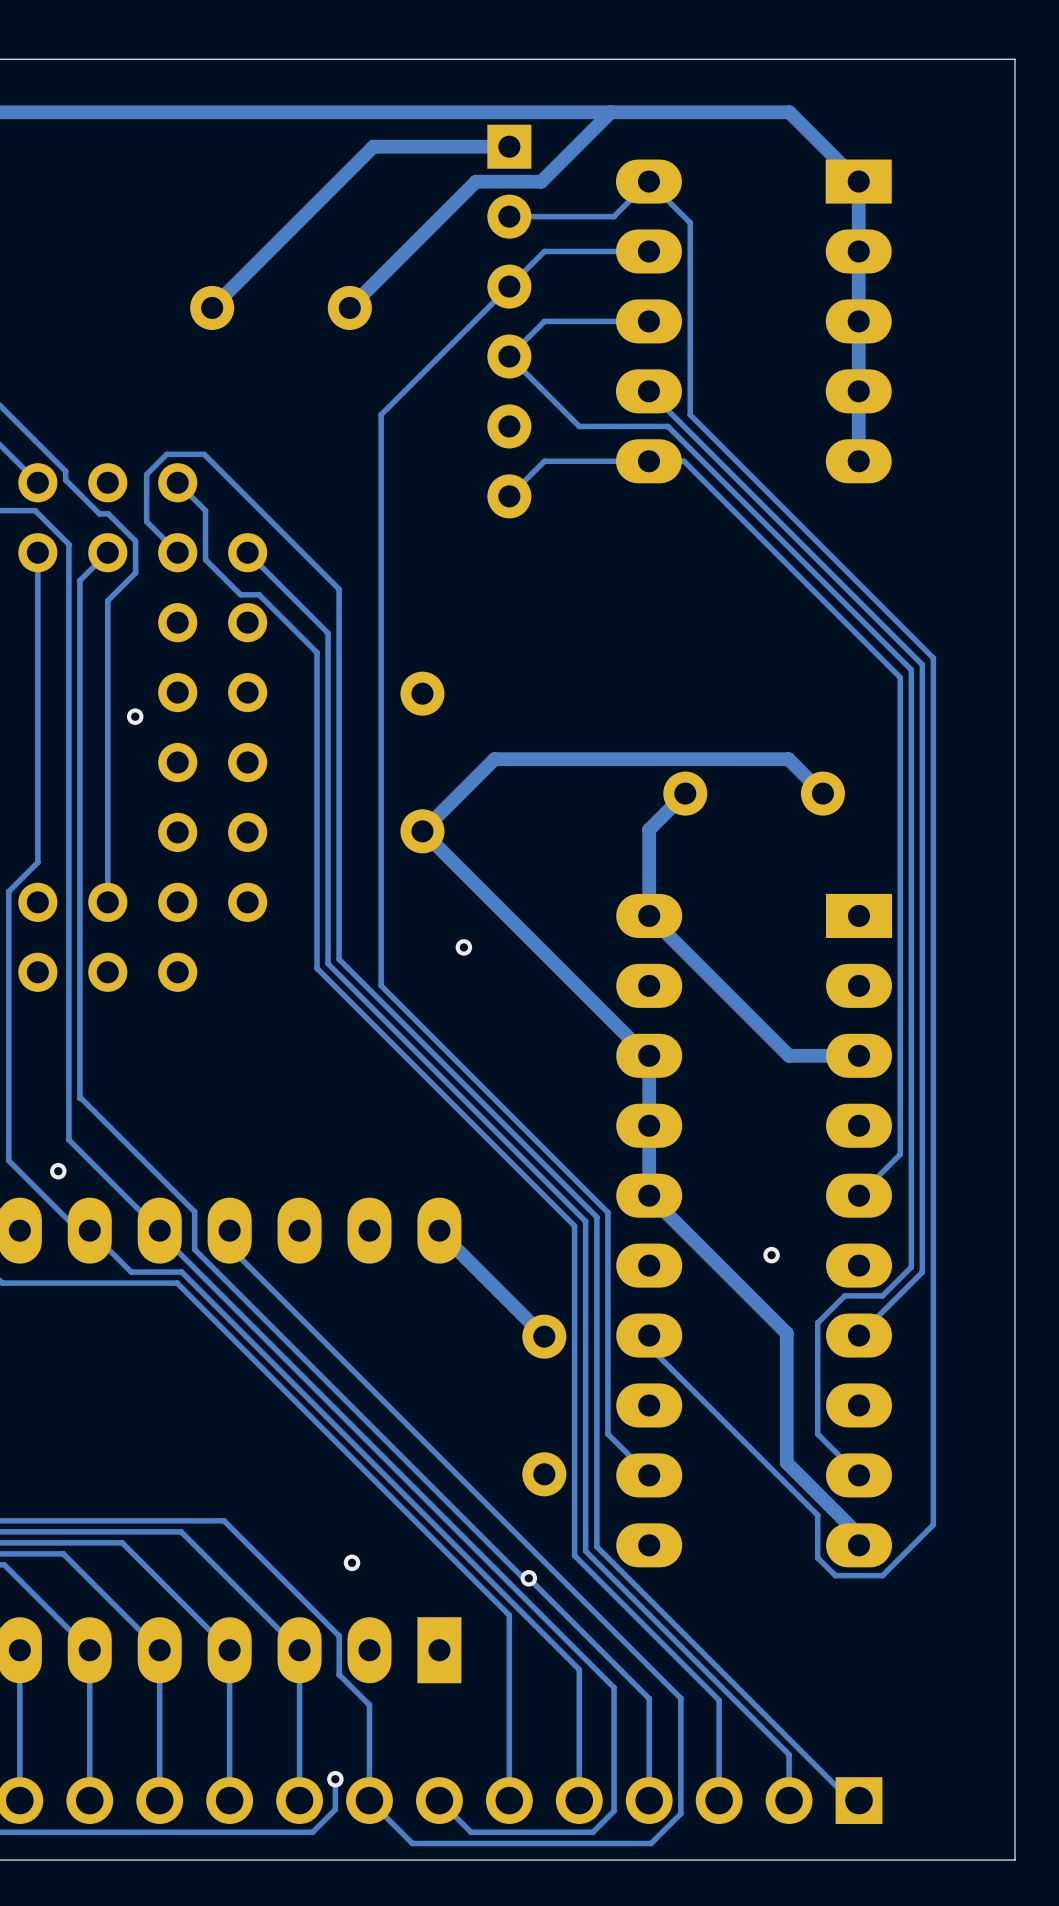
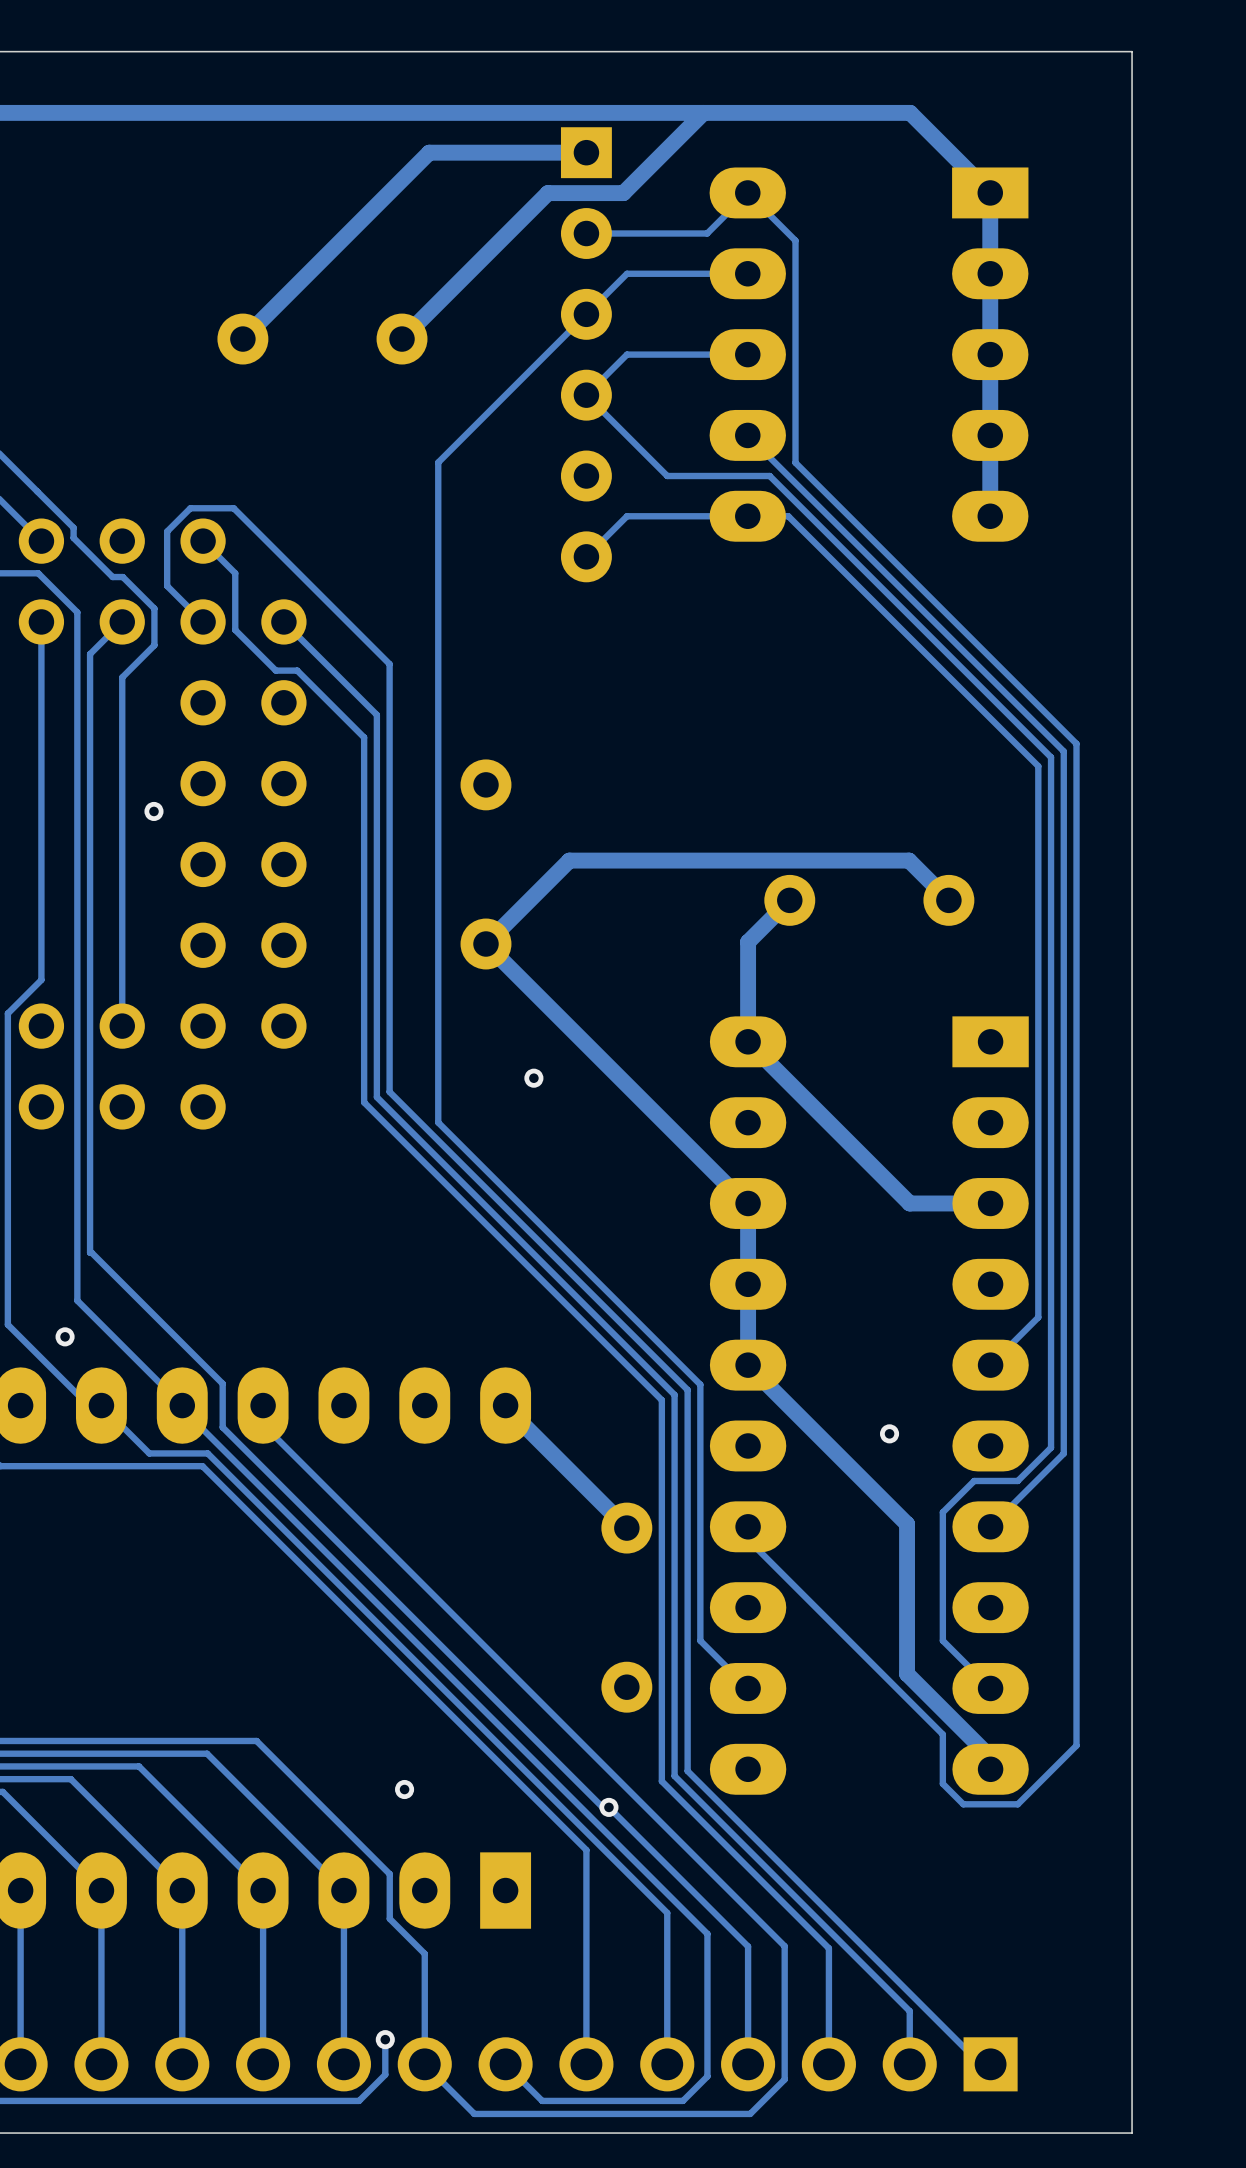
board edge: (981, 59) (1014, 59) (1014, 1860) (981, 1860) -> (1132, 51) (1132, 2133)

